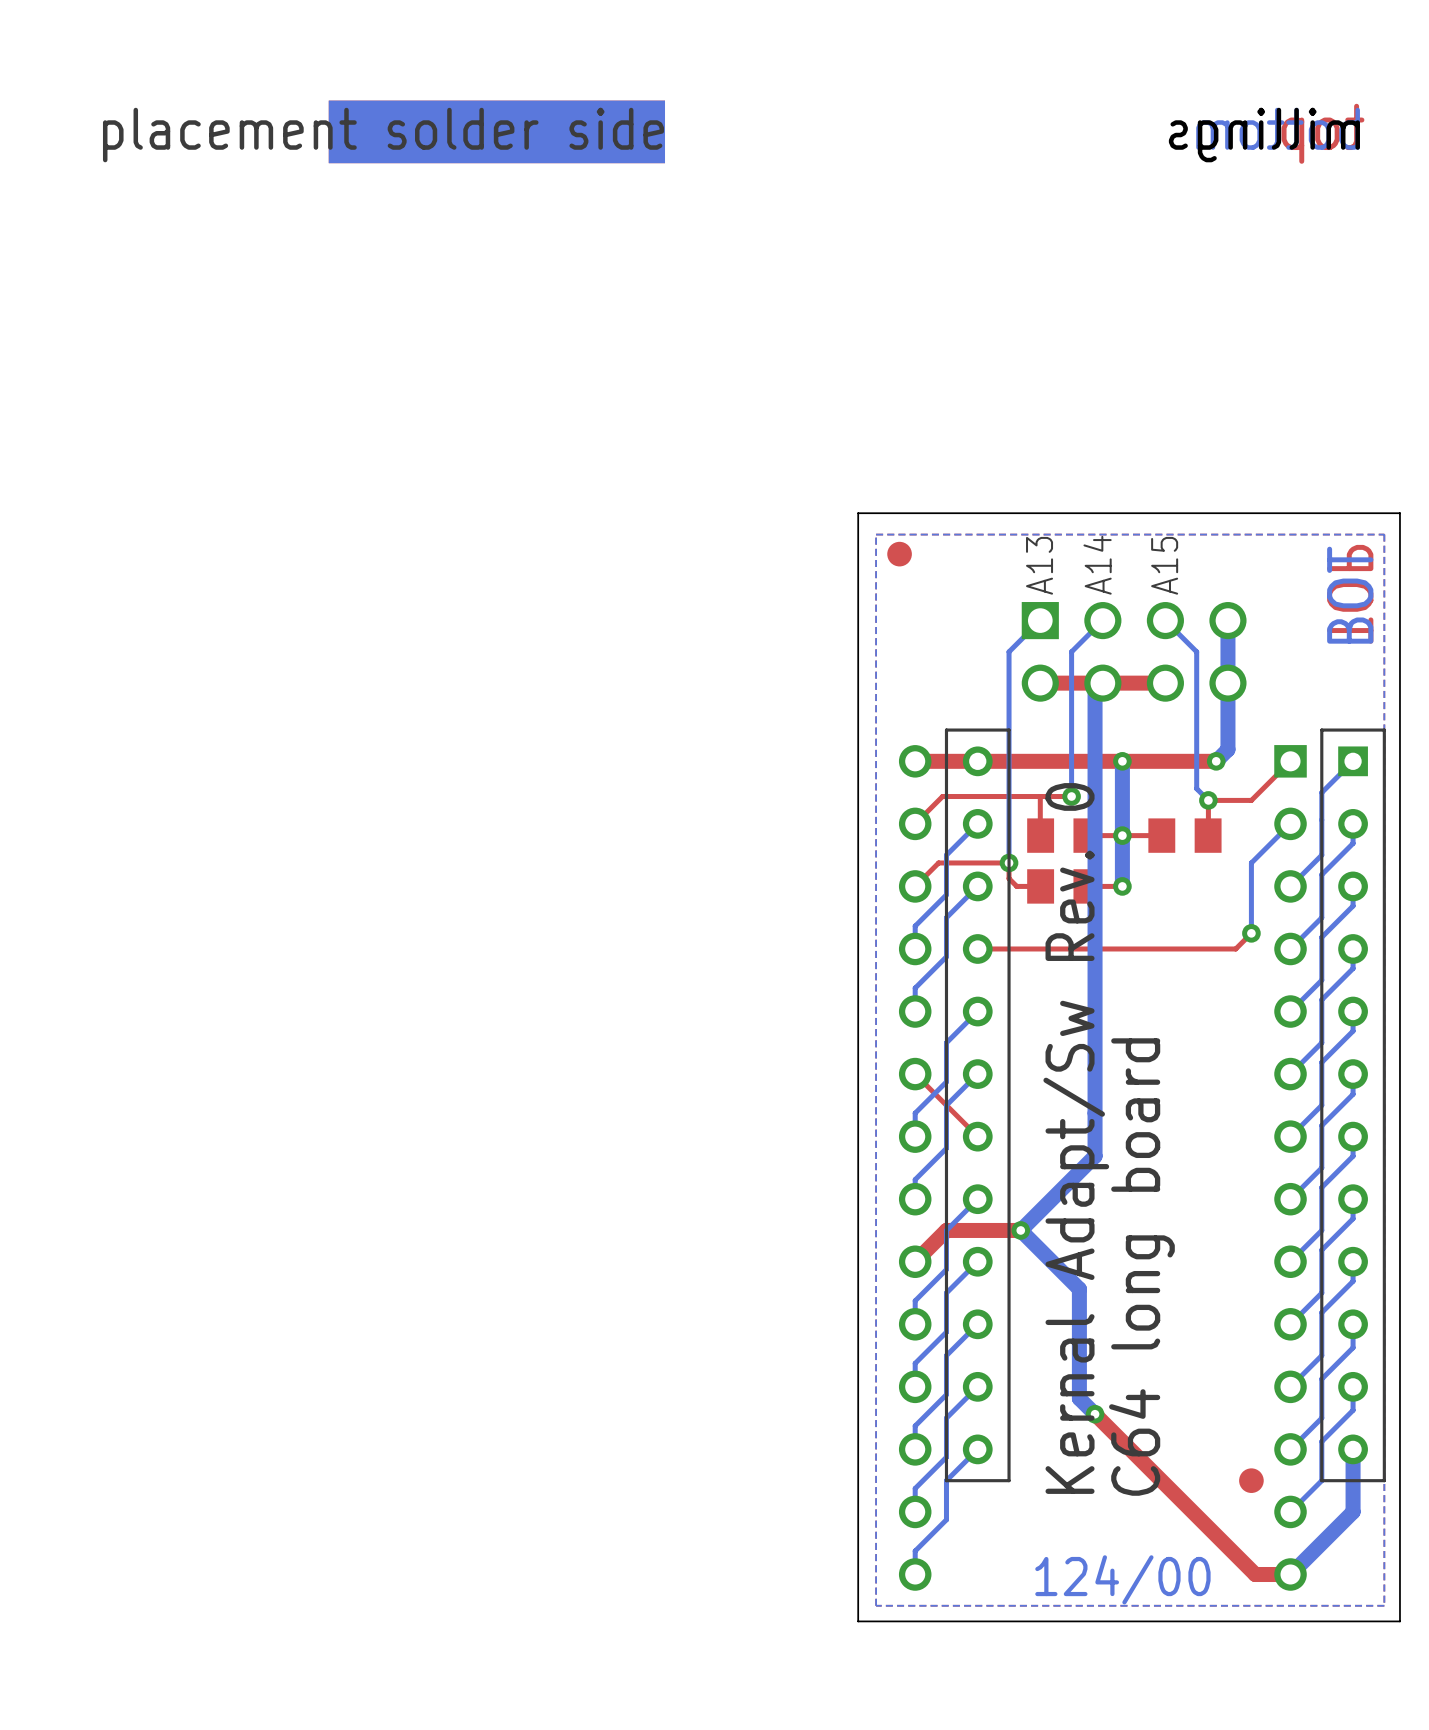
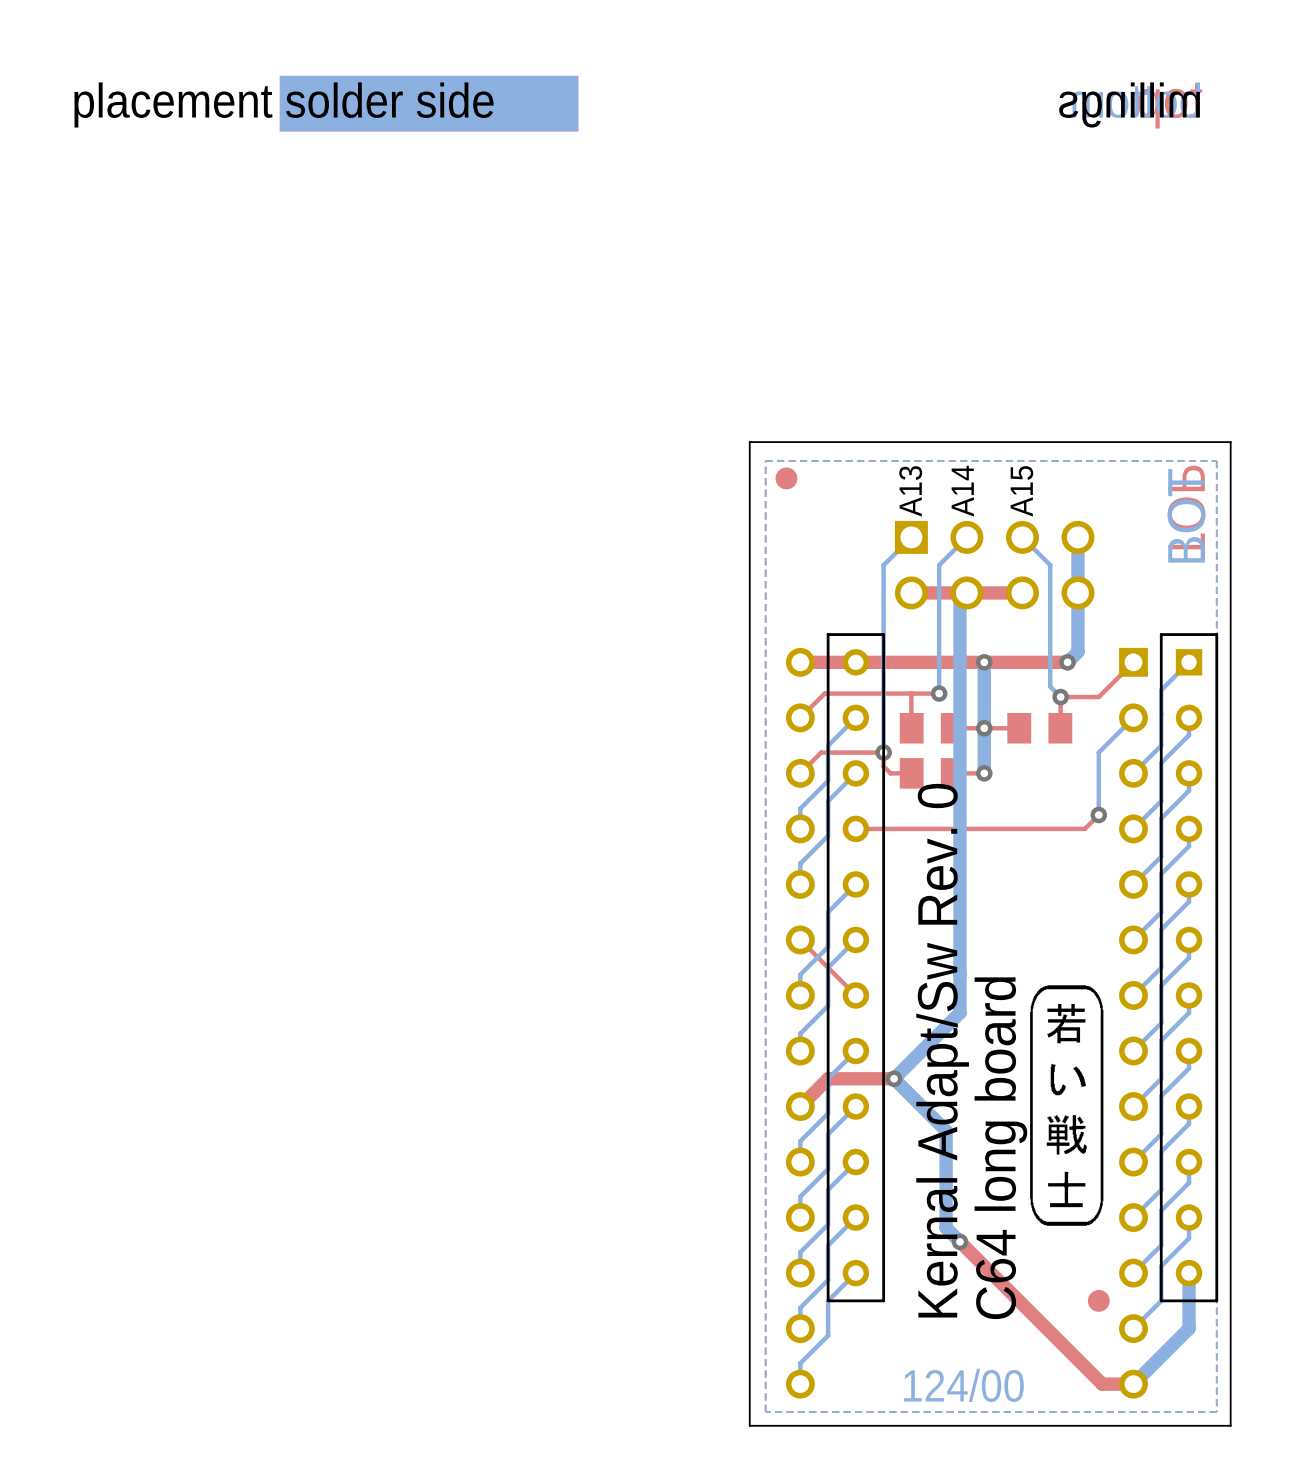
drawing: none -> [1030, 985, 1104, 1226]

